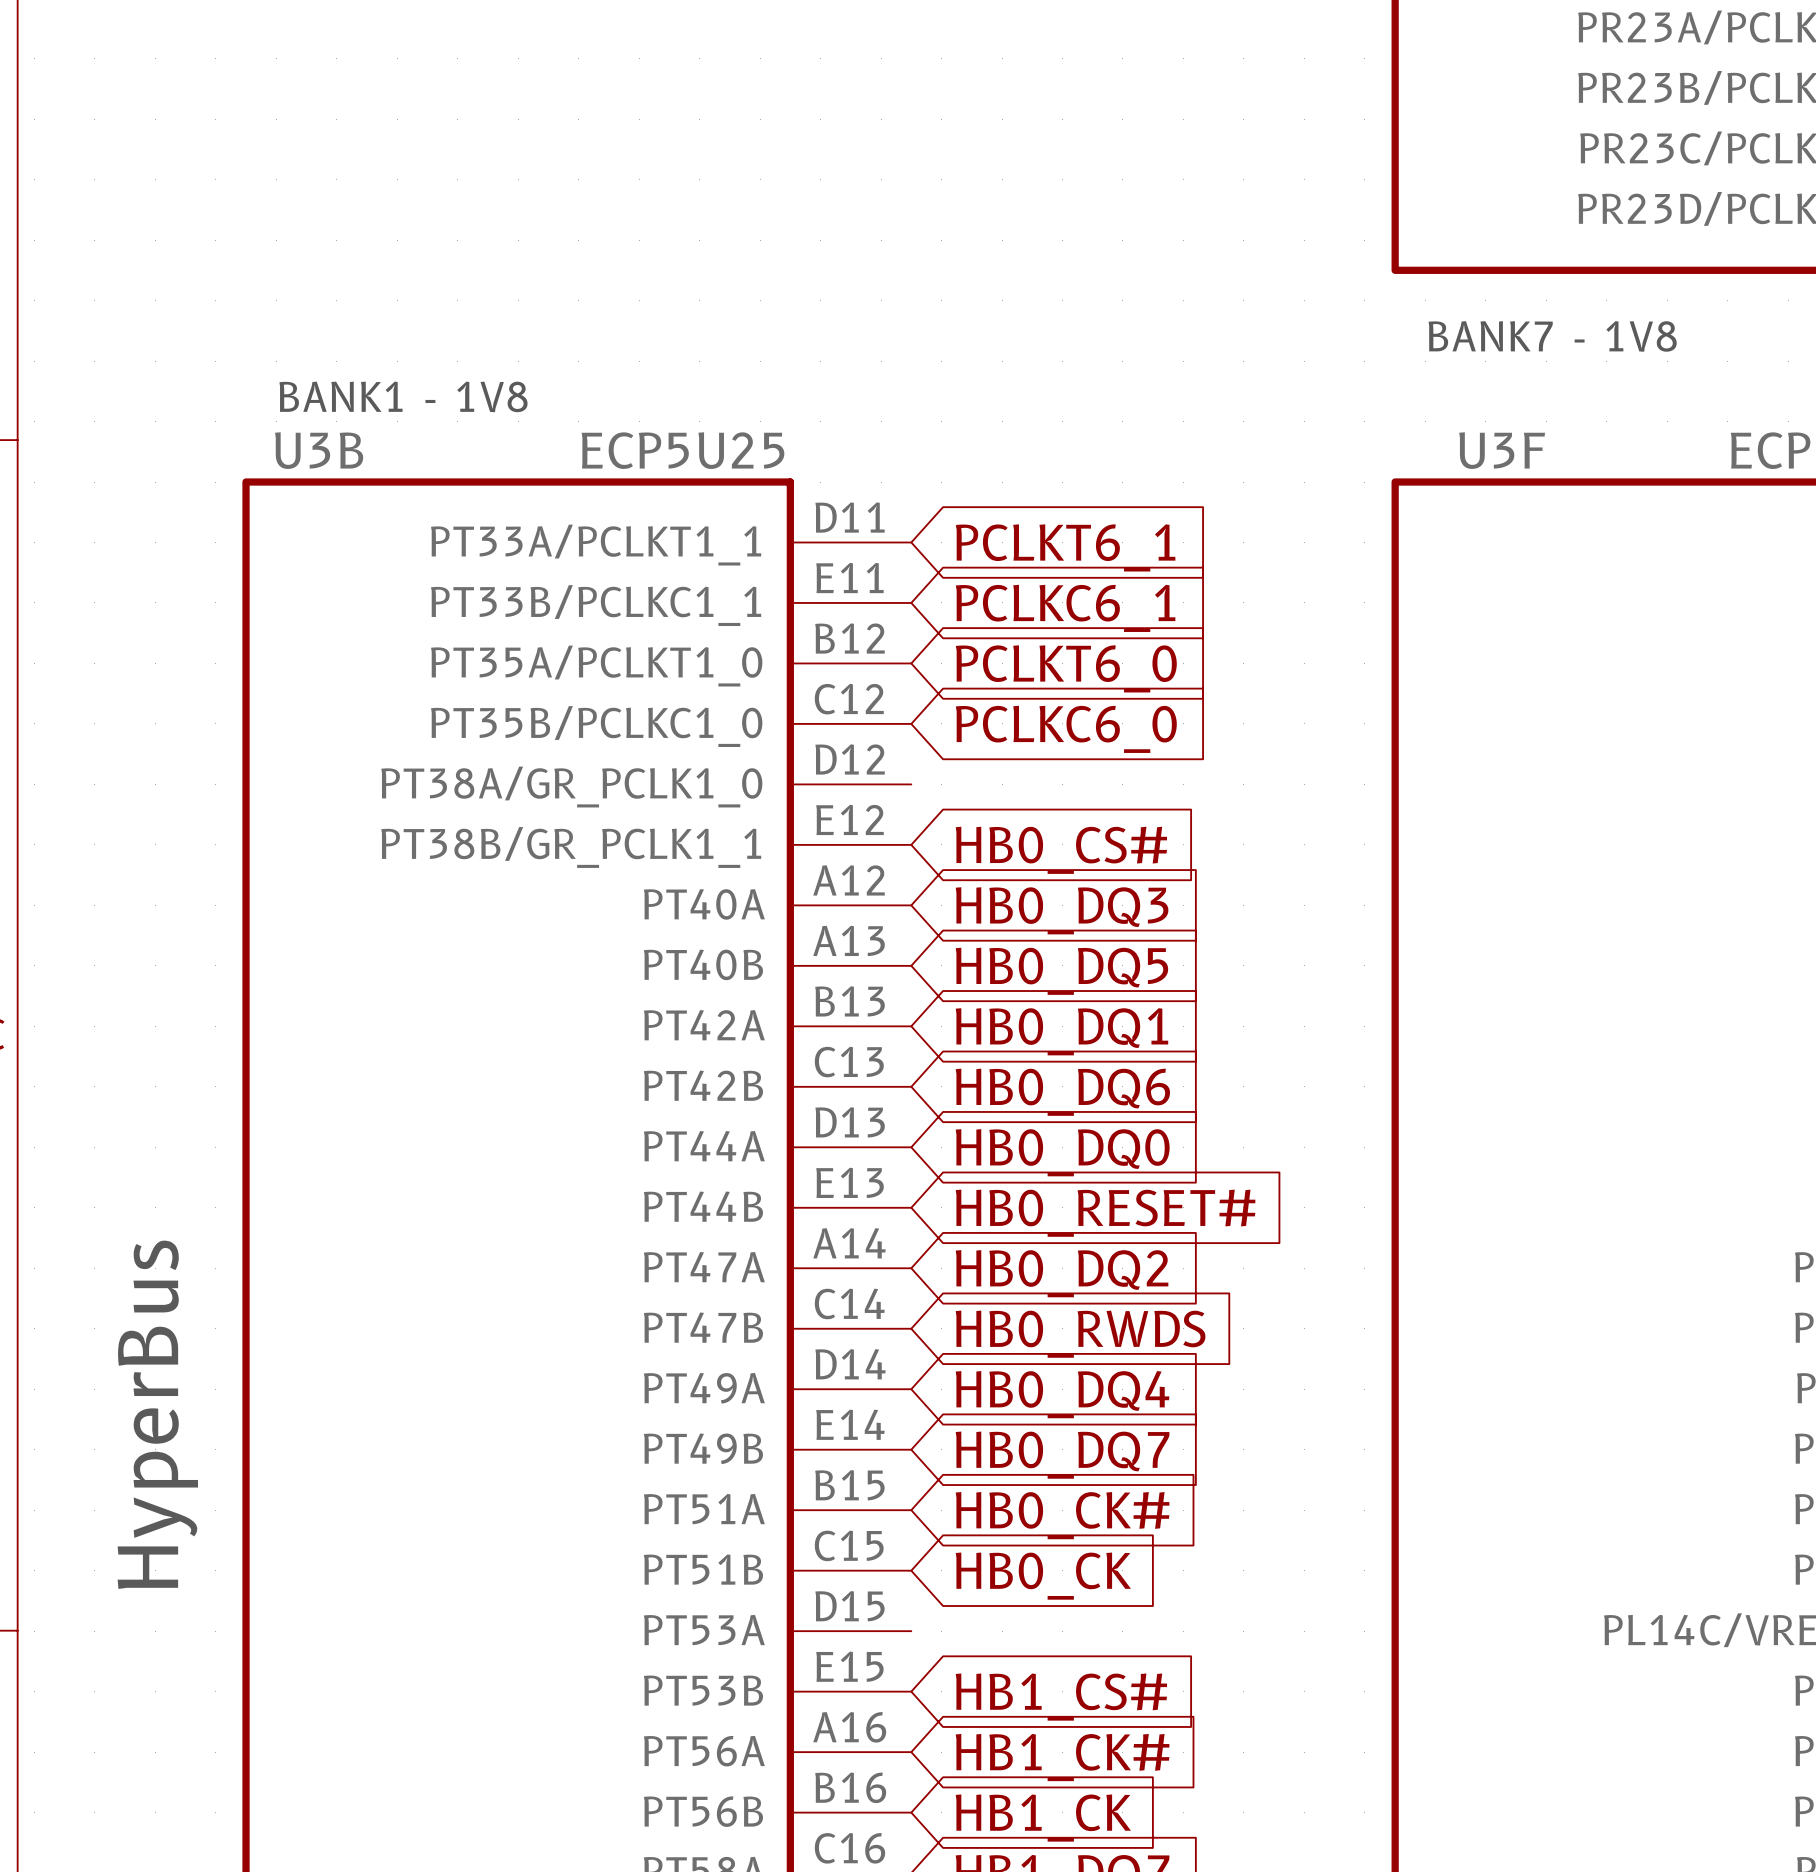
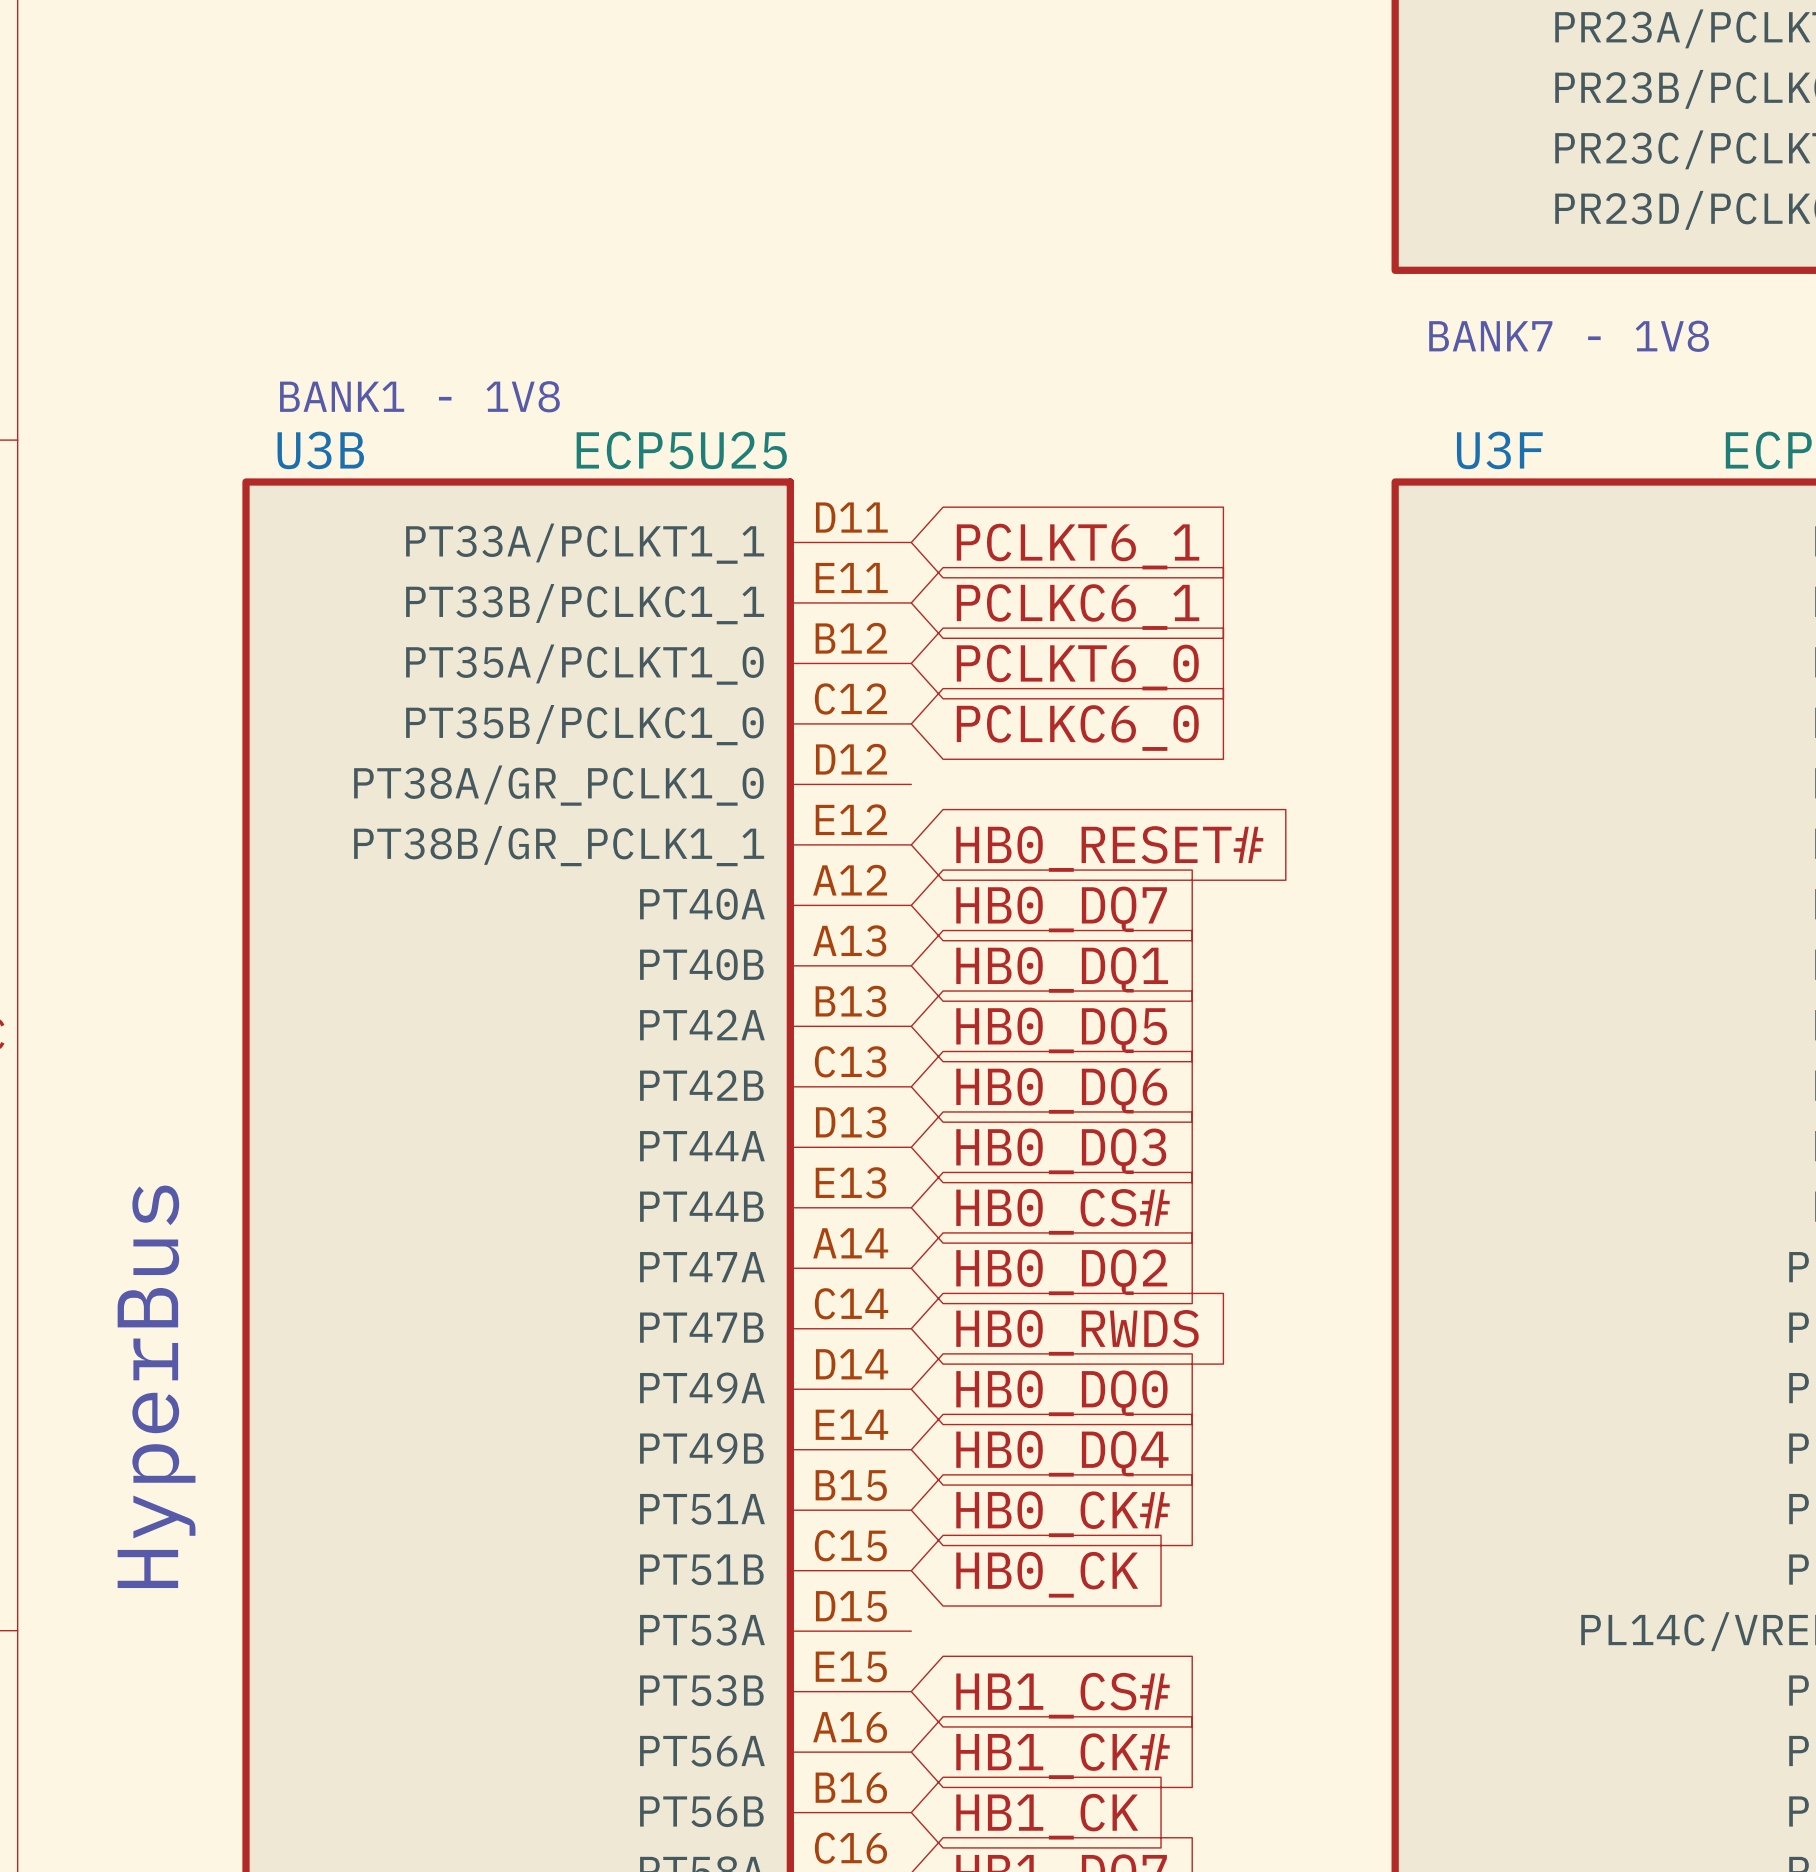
global label: HB0_CS# (1061, 850) -> HB0_RESET# (1109, 848)
global label: HB0_DQ3 (1062, 910) -> HB0_DQ7 (1061, 909)
global label: HB0_DQ5 (1061, 971) -> HB0_DQ1 (1062, 969)
global label: HB0_DQ1 (1061, 1031) -> HB0_DQ5 (1061, 1030)
global label: HB0_DQ0 (1062, 1152) -> HB0_DQ3 (1061, 1151)
global label: HB0_RESET# (1105, 1213) -> HB0_CS# (1062, 1211)
global label: HB0_DQ4 (1062, 1394) -> HB0_DQ0 (1061, 1393)
global label: HB0_DQ7 (1062, 1455) -> HB0_DQ4 (1062, 1453)

